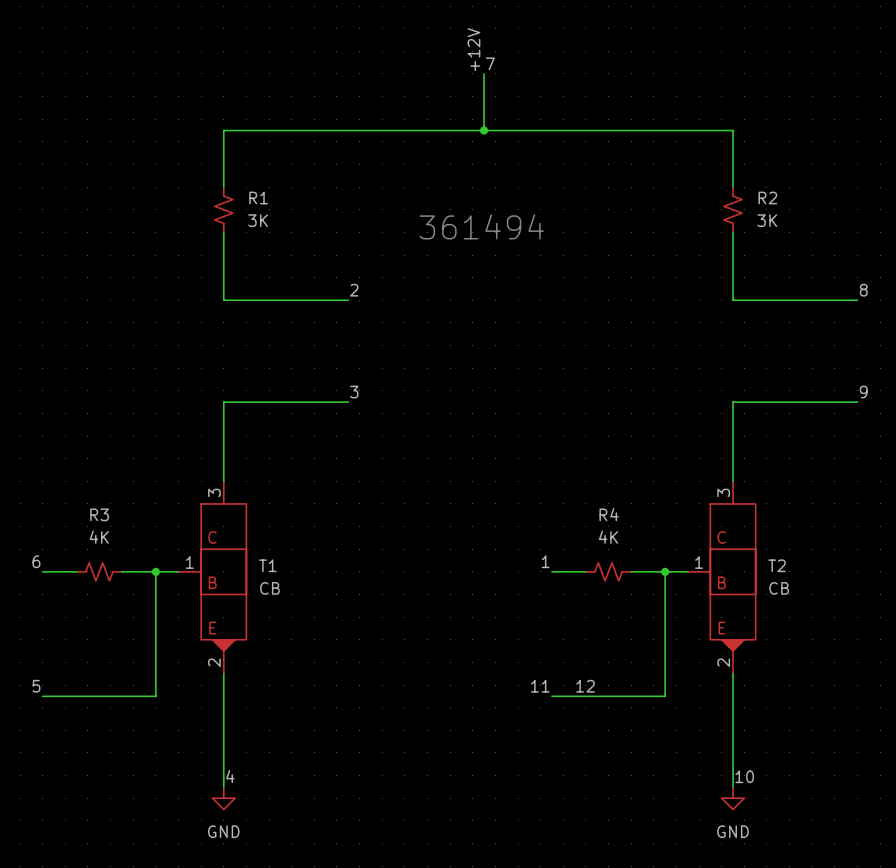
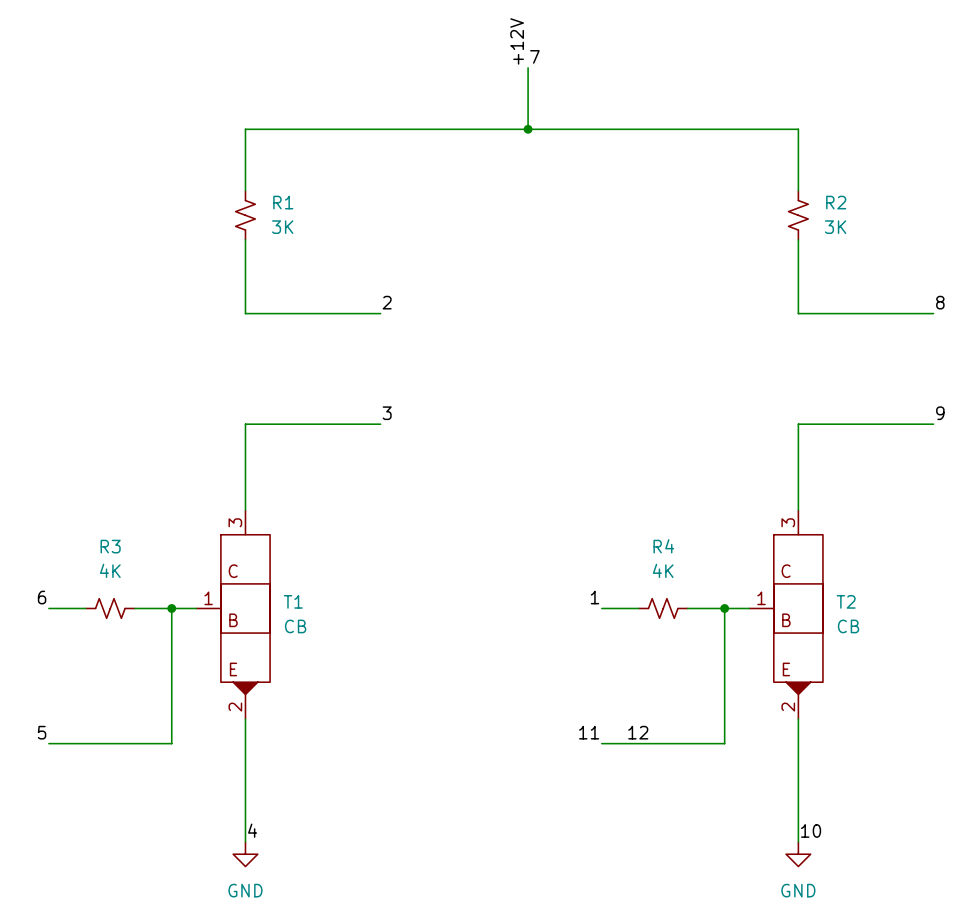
text: 361494 (481, 226) -> none

